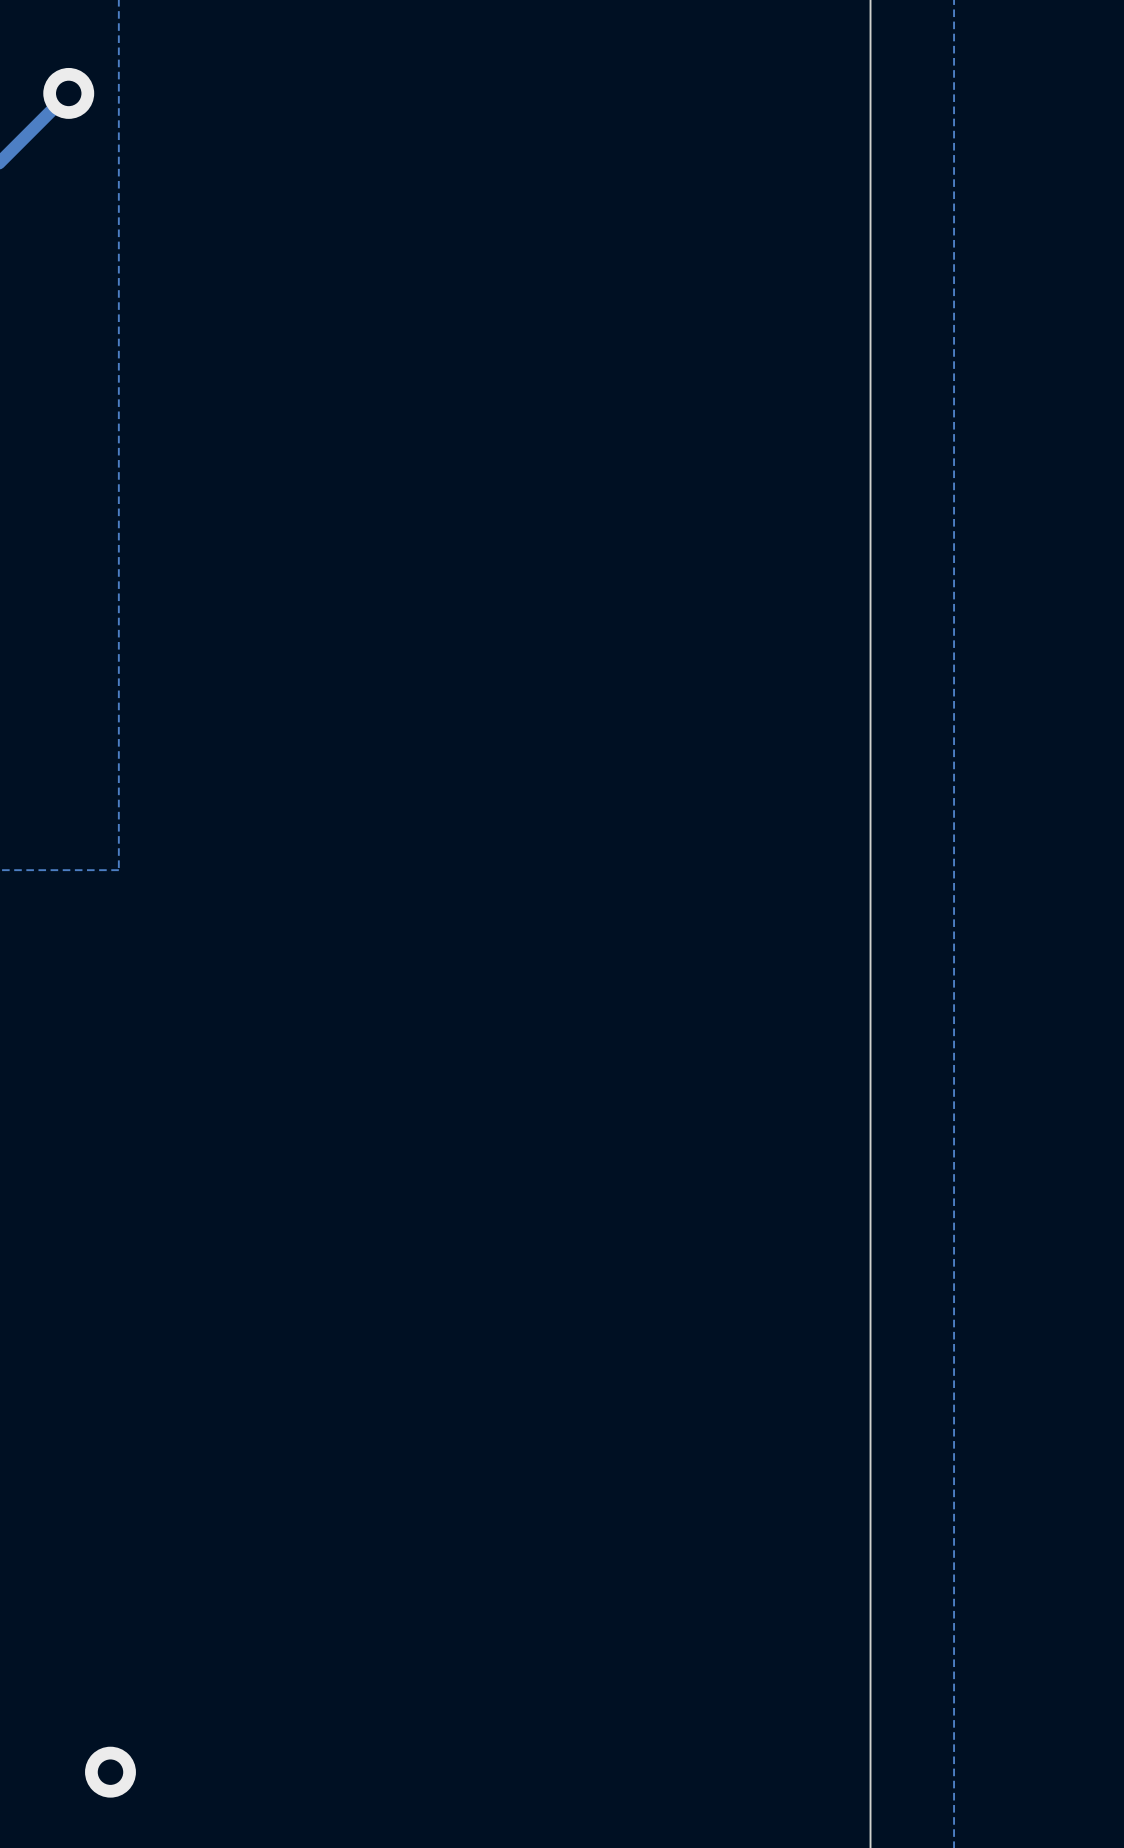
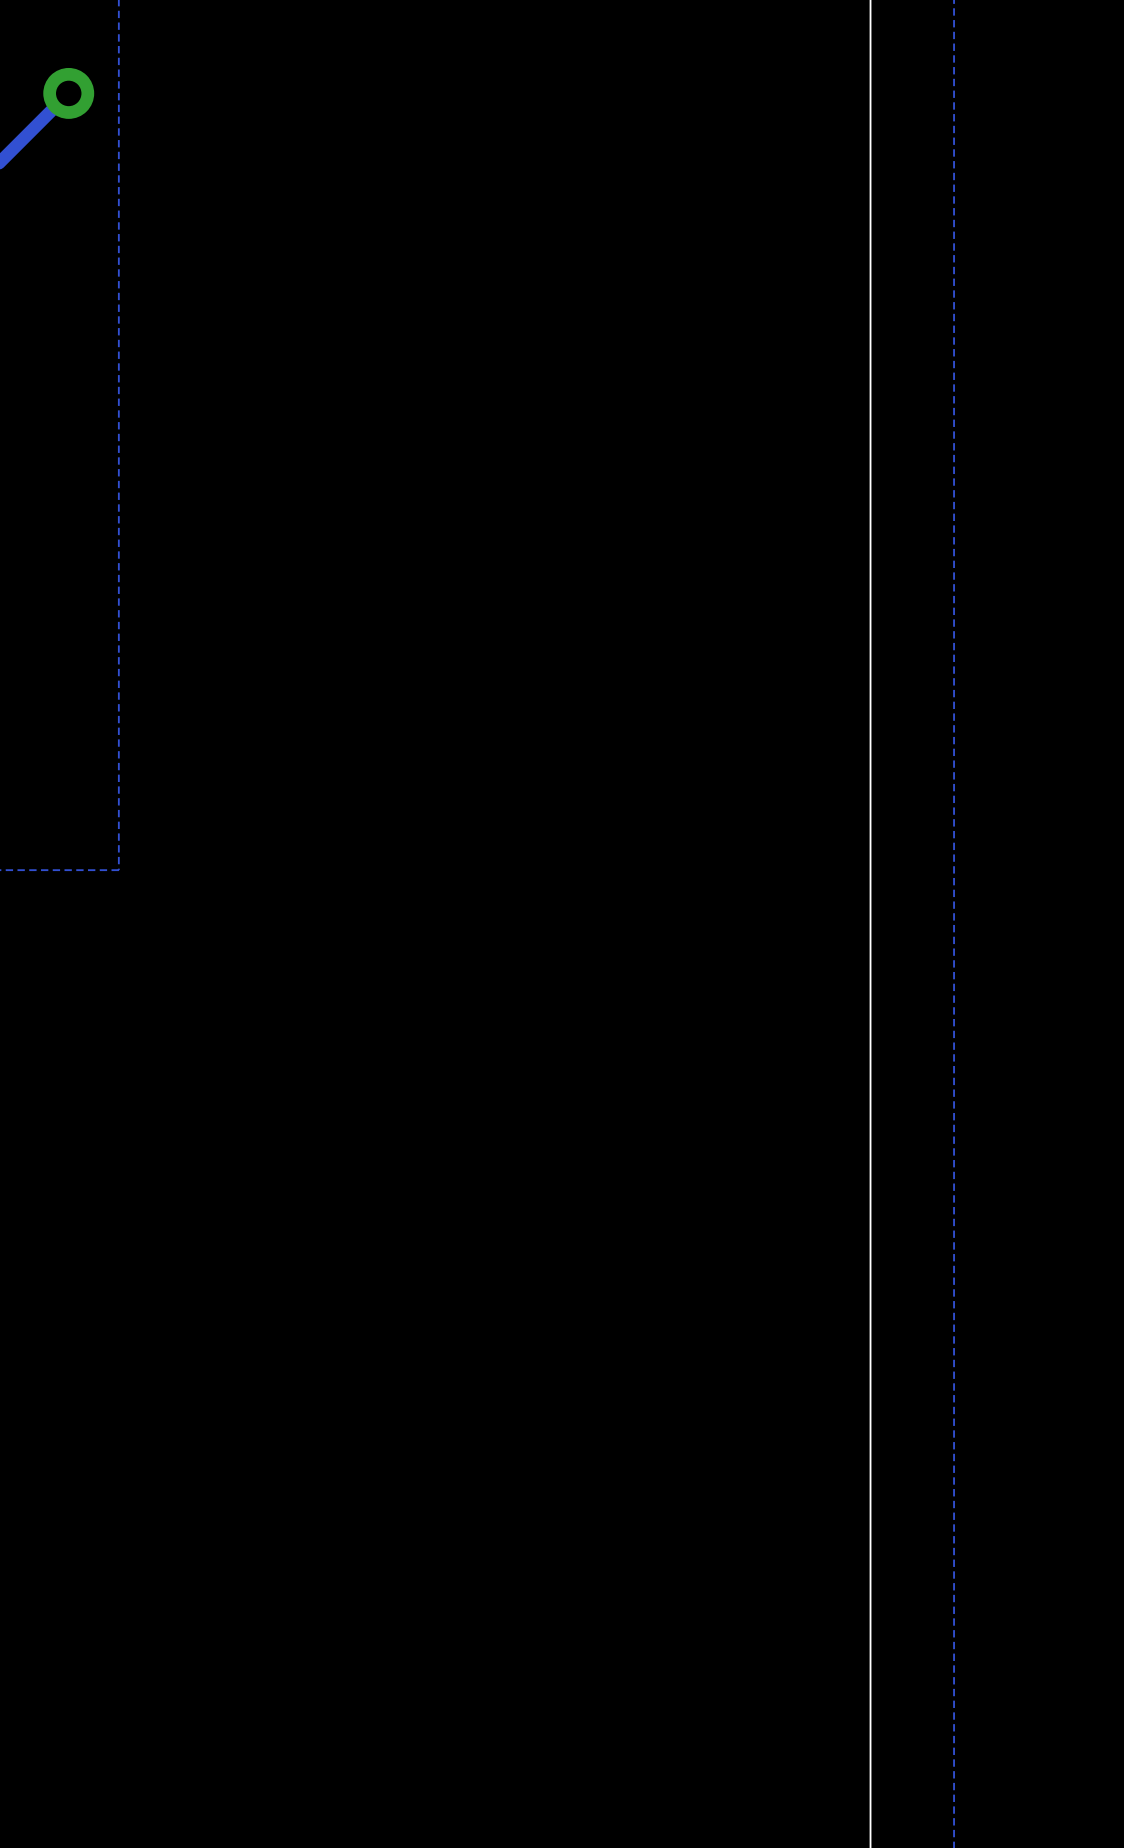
via: (110, 1772) -> none

